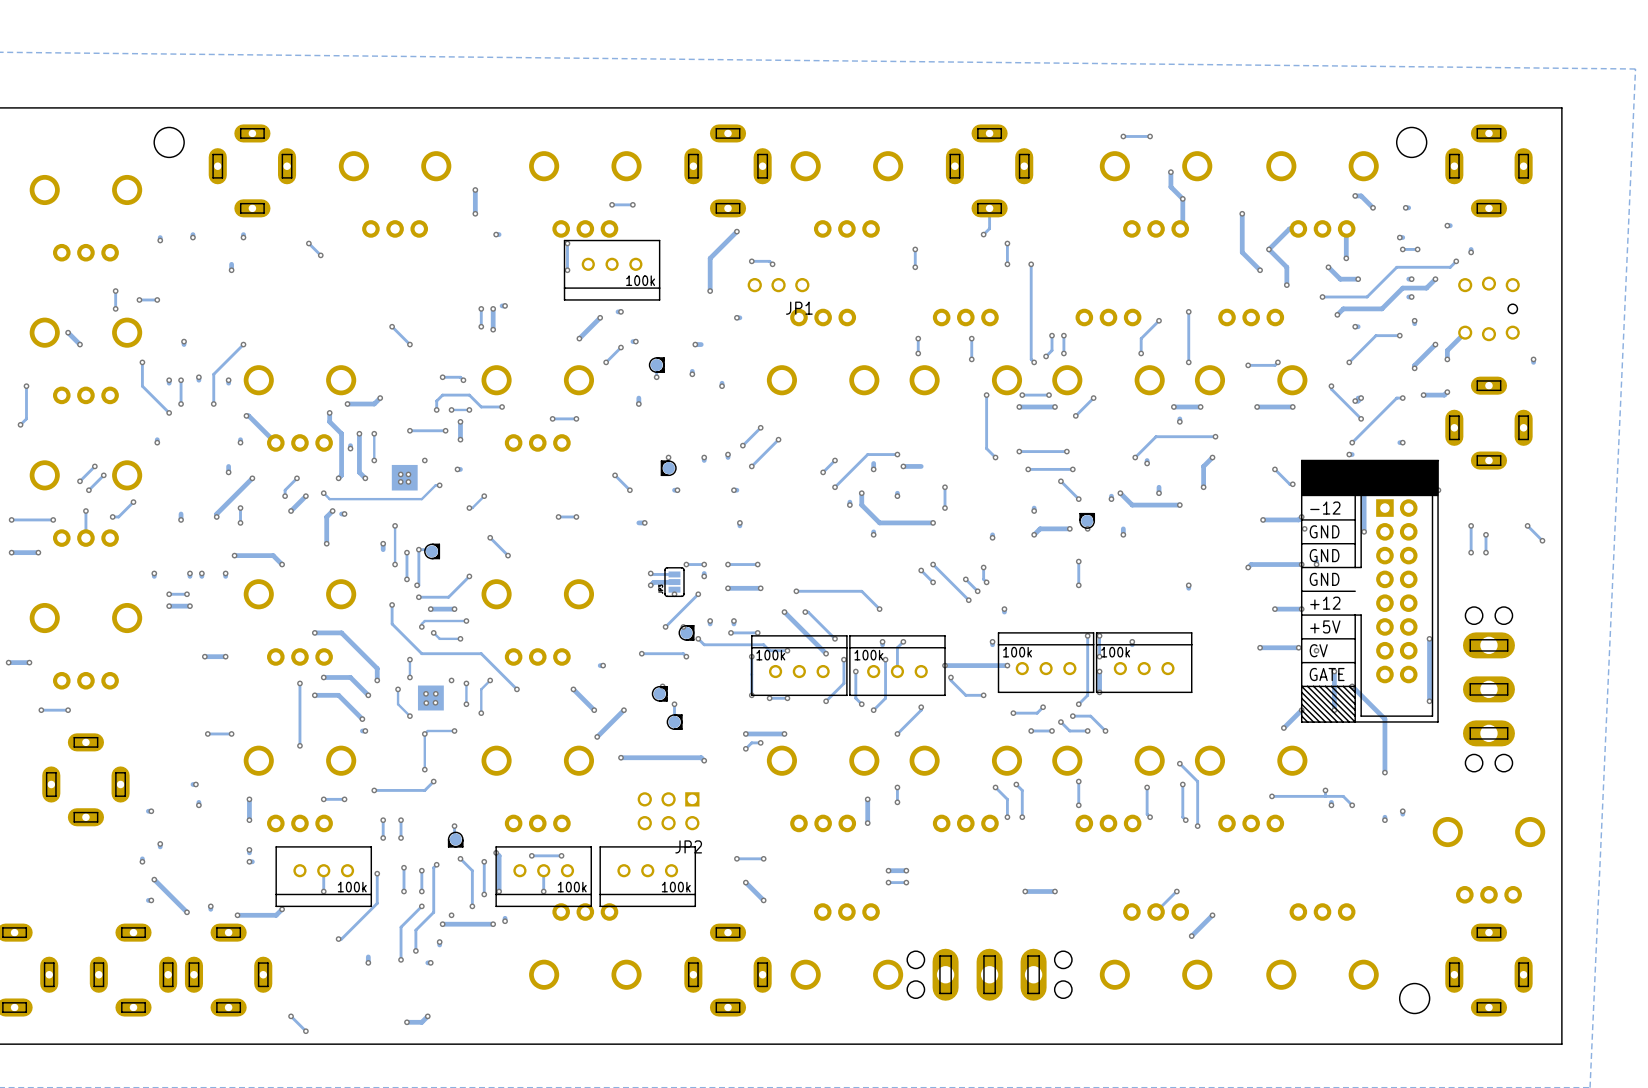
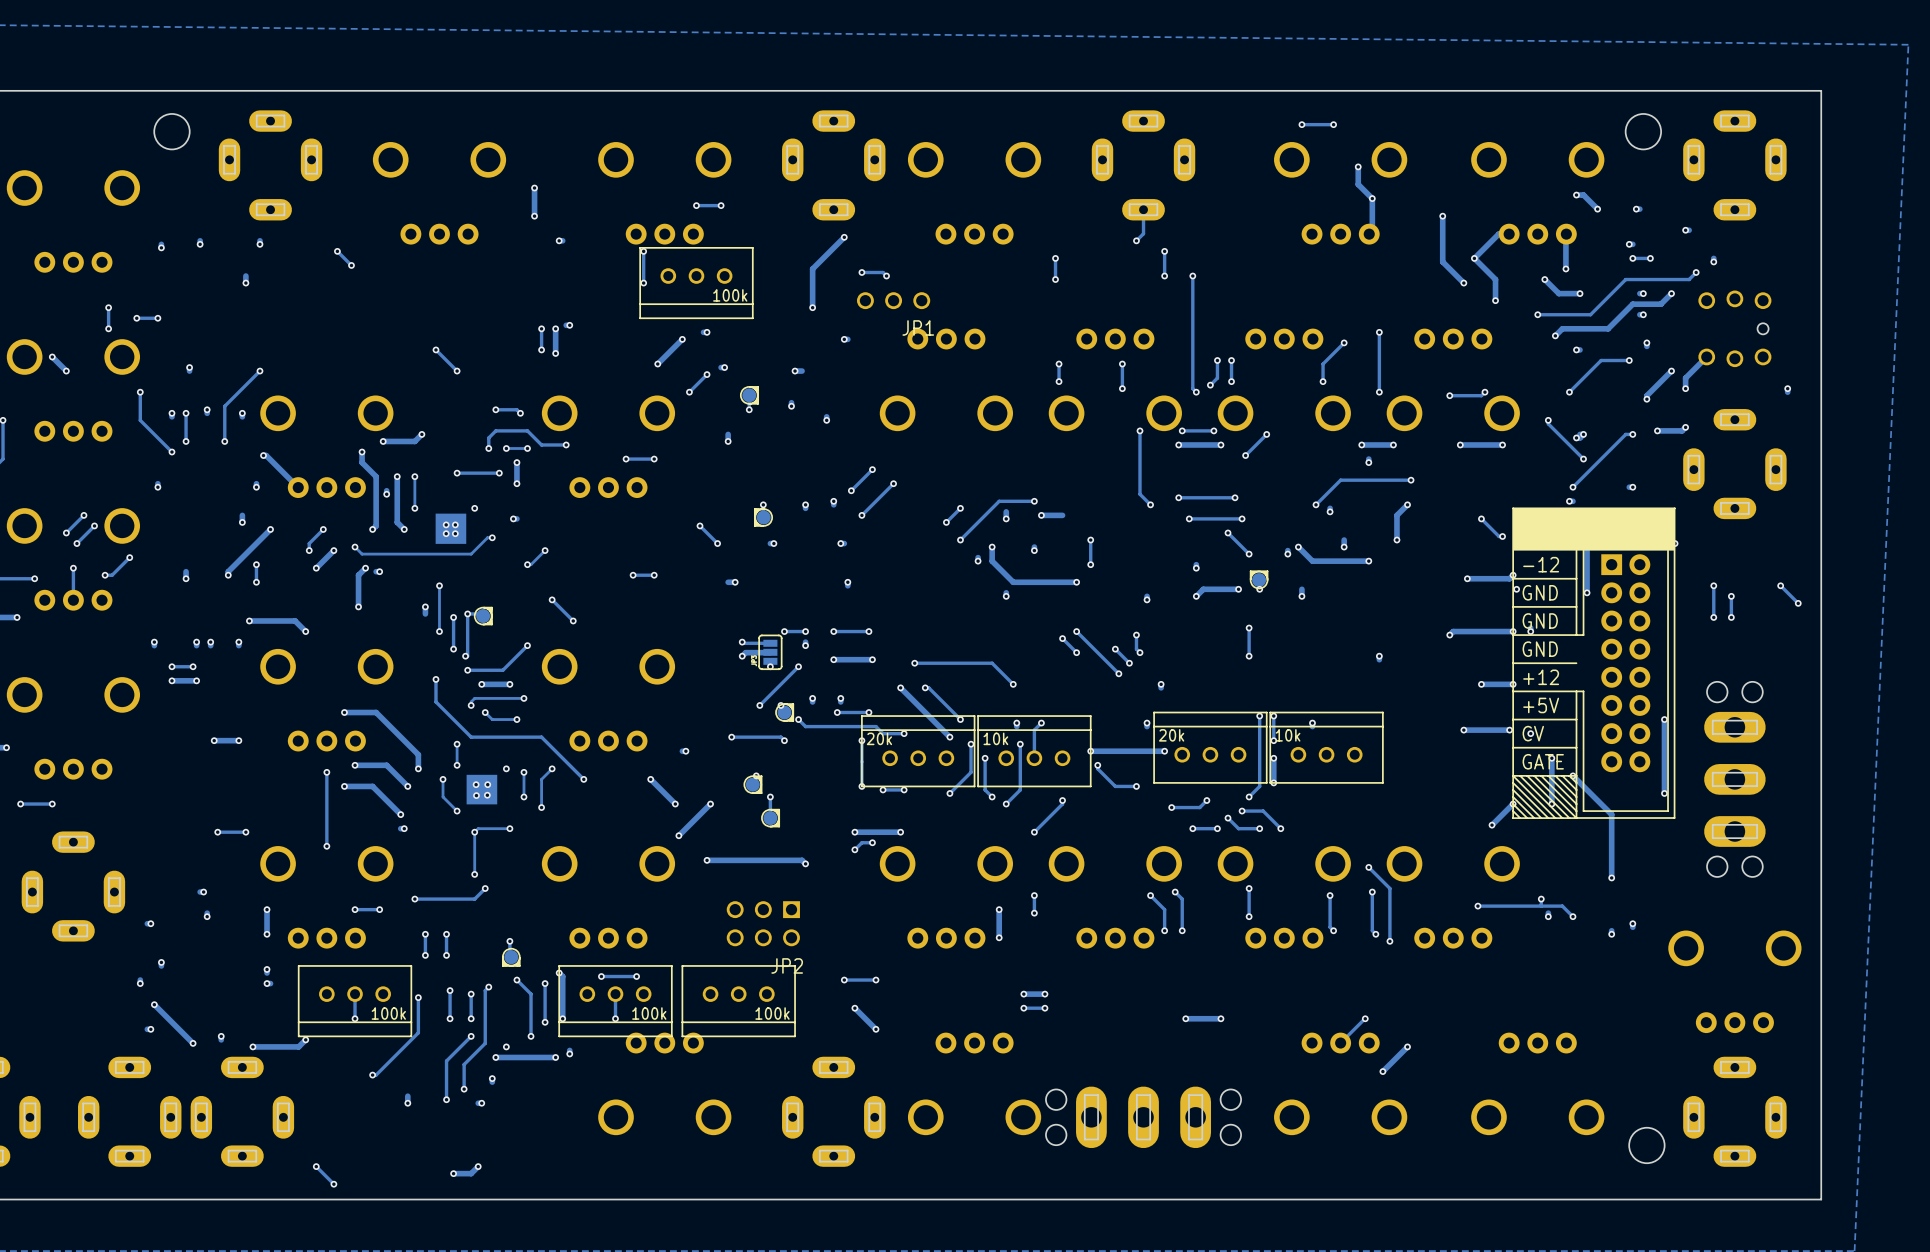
part value: 100k (1017, 652) -> 20k (1171, 735)
part value: 100k (1115, 652) -> 10k (1288, 735)
part value: 100k (770, 655) -> 20k (879, 738)
part value: 100k (868, 655) -> 10k (995, 738)

